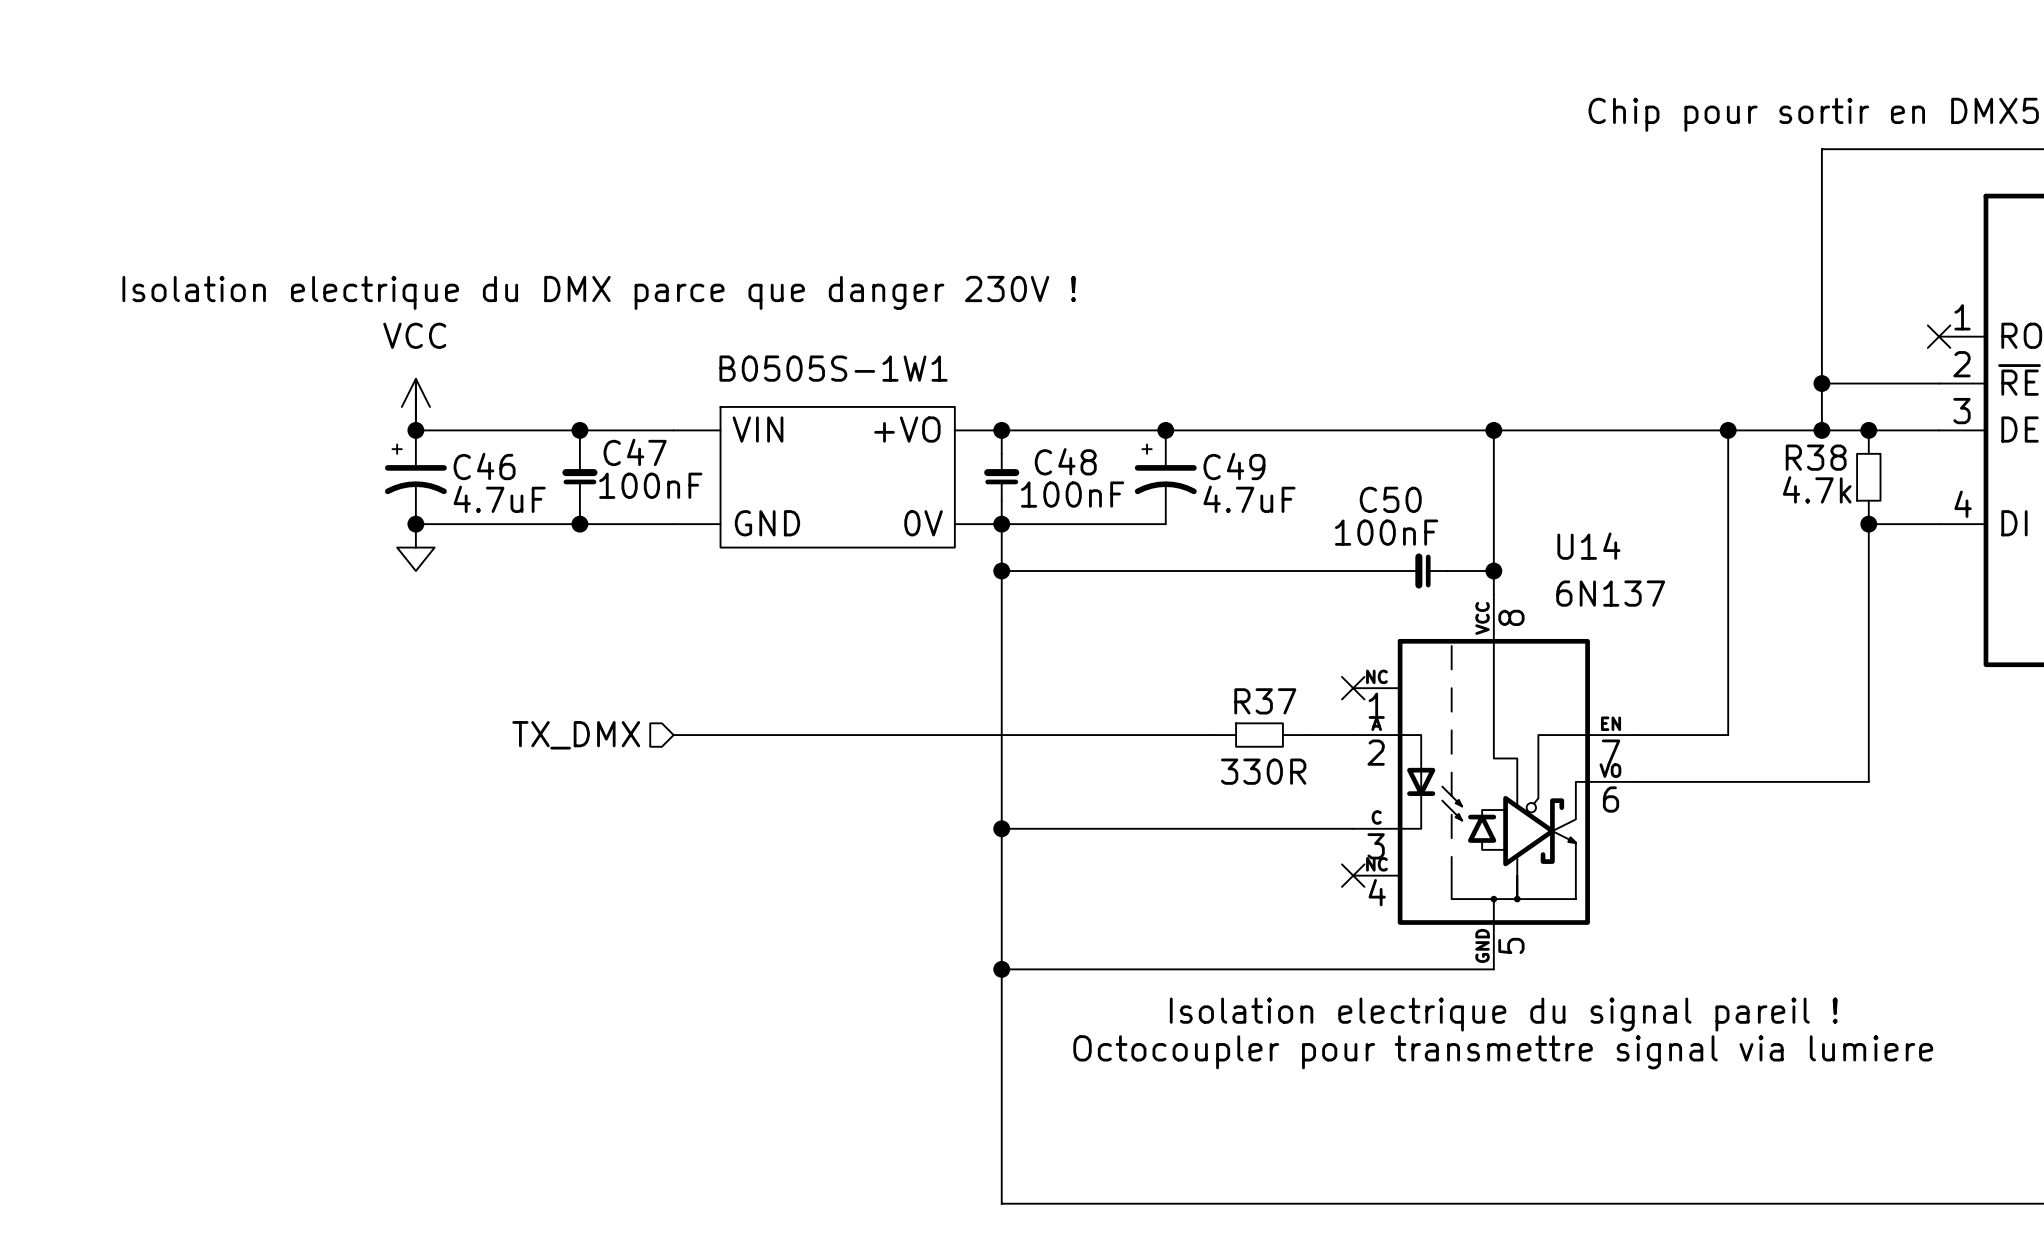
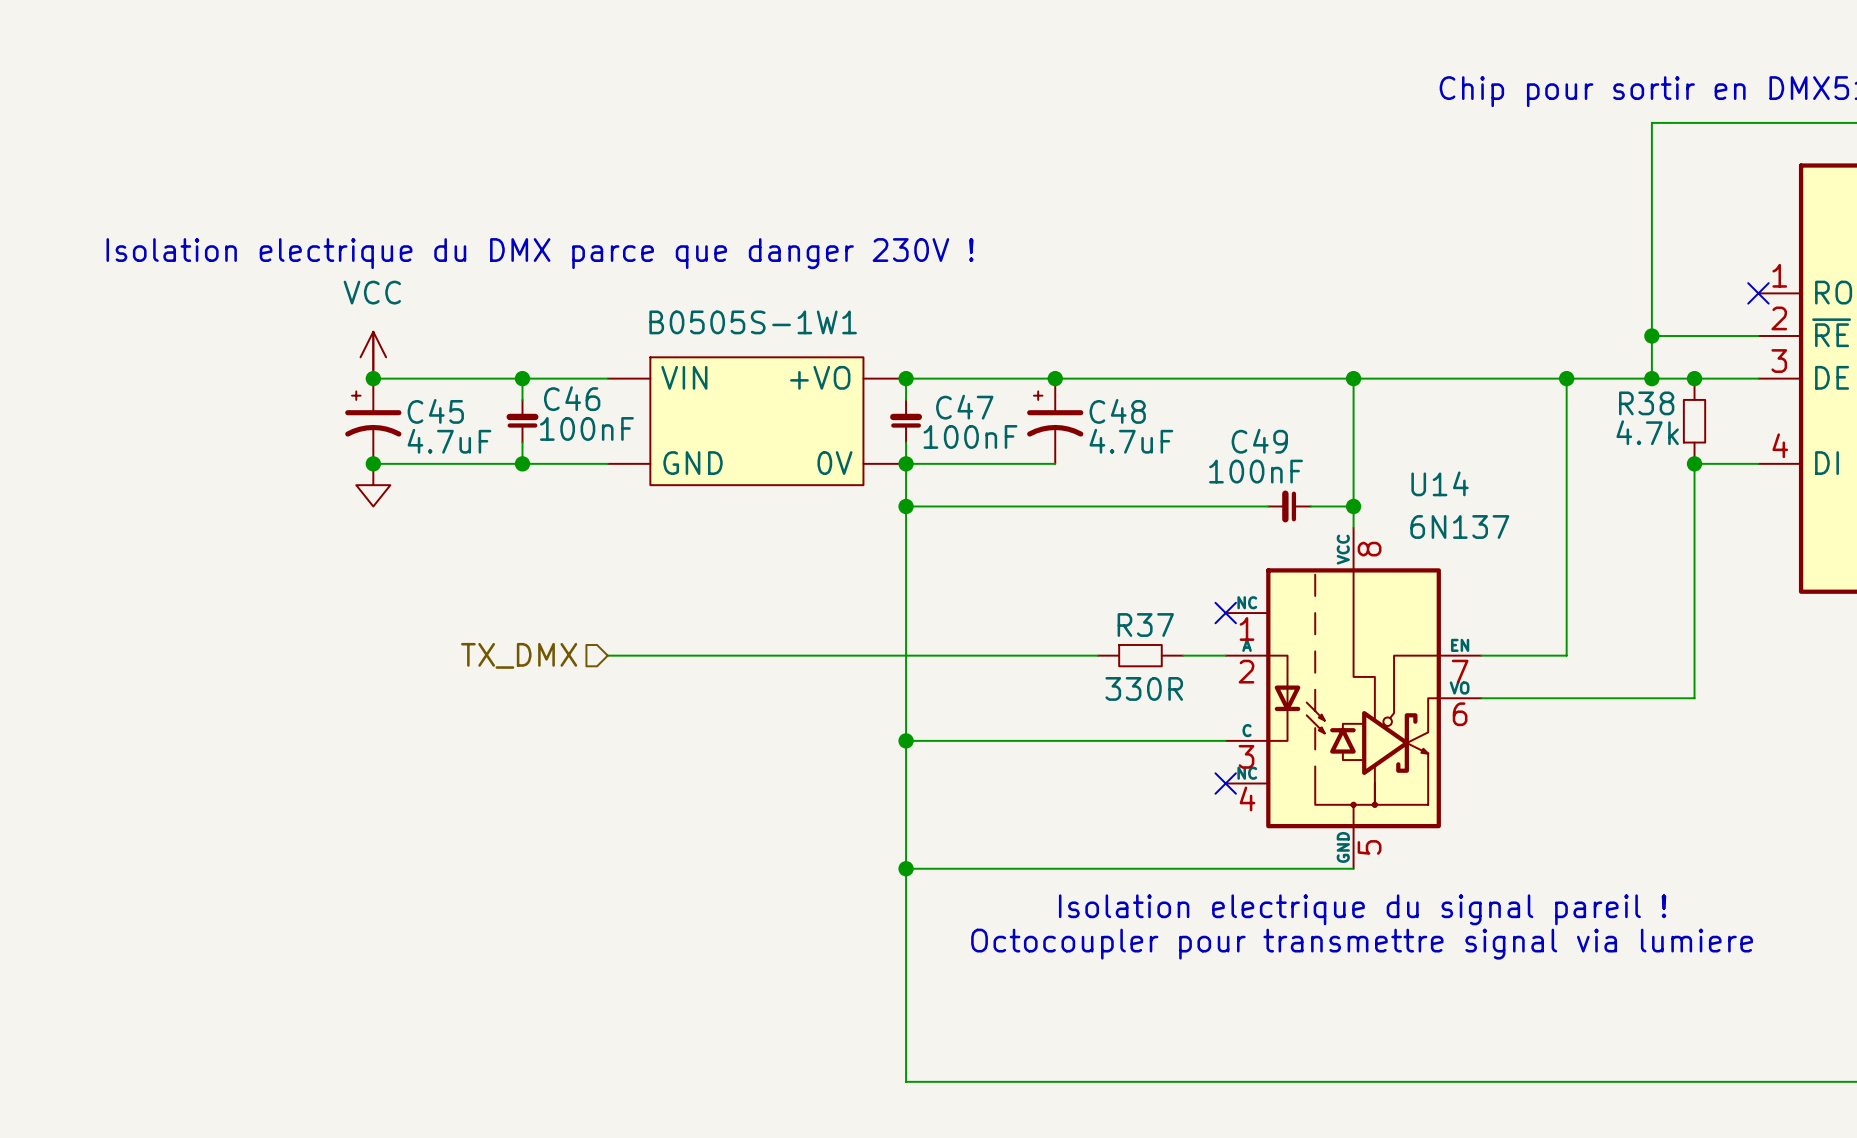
C47 name: C47 (635, 452) -> C46 (572, 398)
C48 name: C48 (1065, 461) -> C47 (964, 407)
C46 name: C46 (484, 466) -> C45 (435, 411)
C49 name: C49 (1234, 466) -> C48 (1117, 411)
C50 name: C50 (1390, 499) -> C49 (1259, 441)

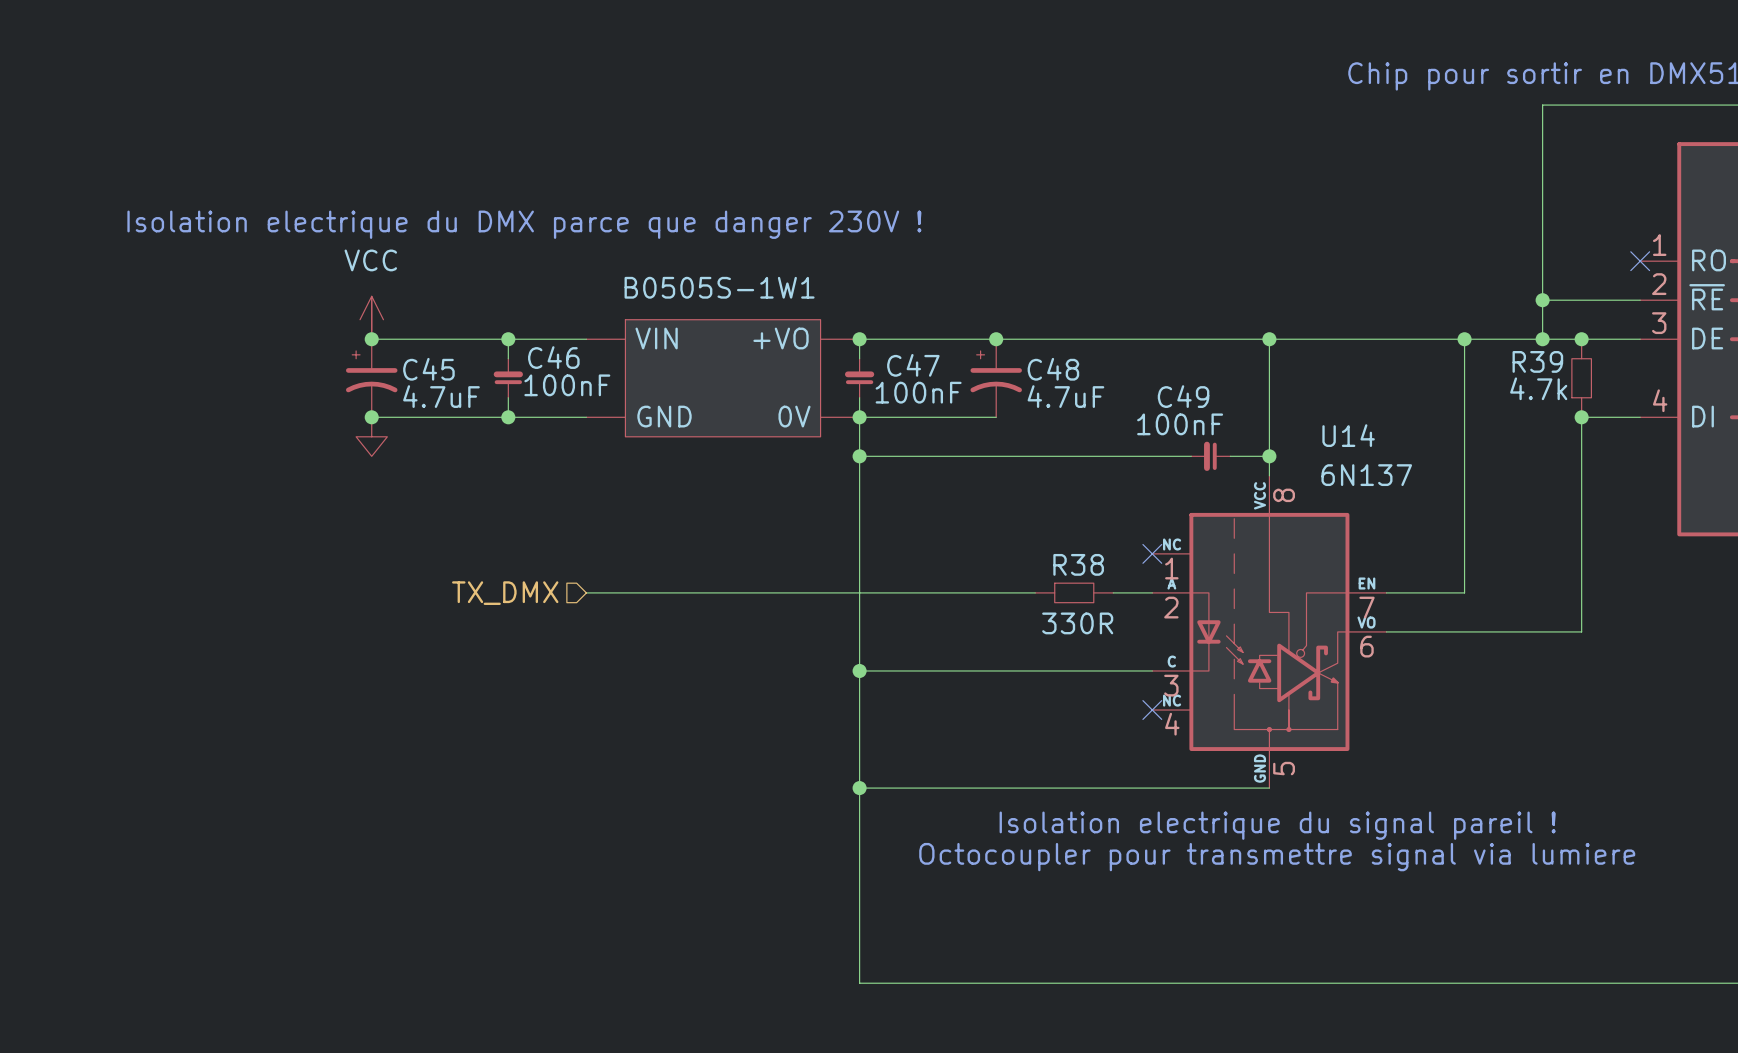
R38 name: R38 (1646, 403) -> R39 (1537, 361)
R37 name: R37 (1145, 625) -> R38 (1078, 564)

